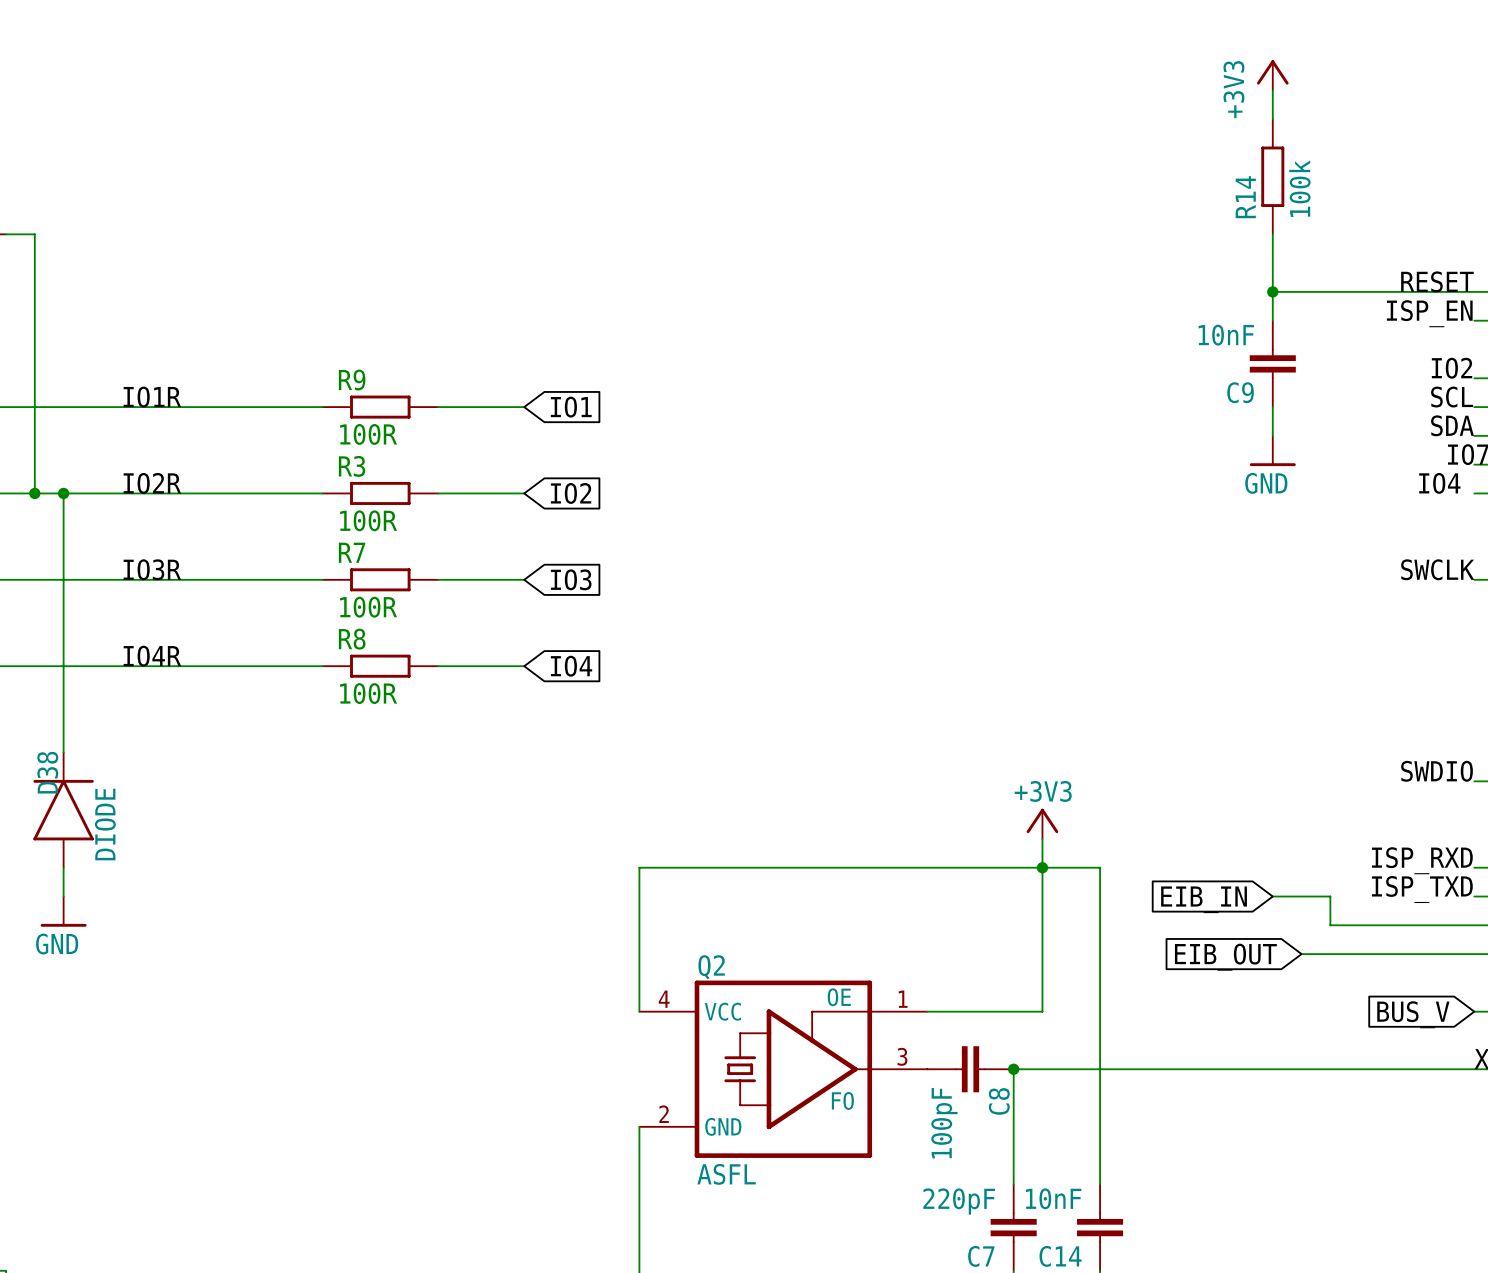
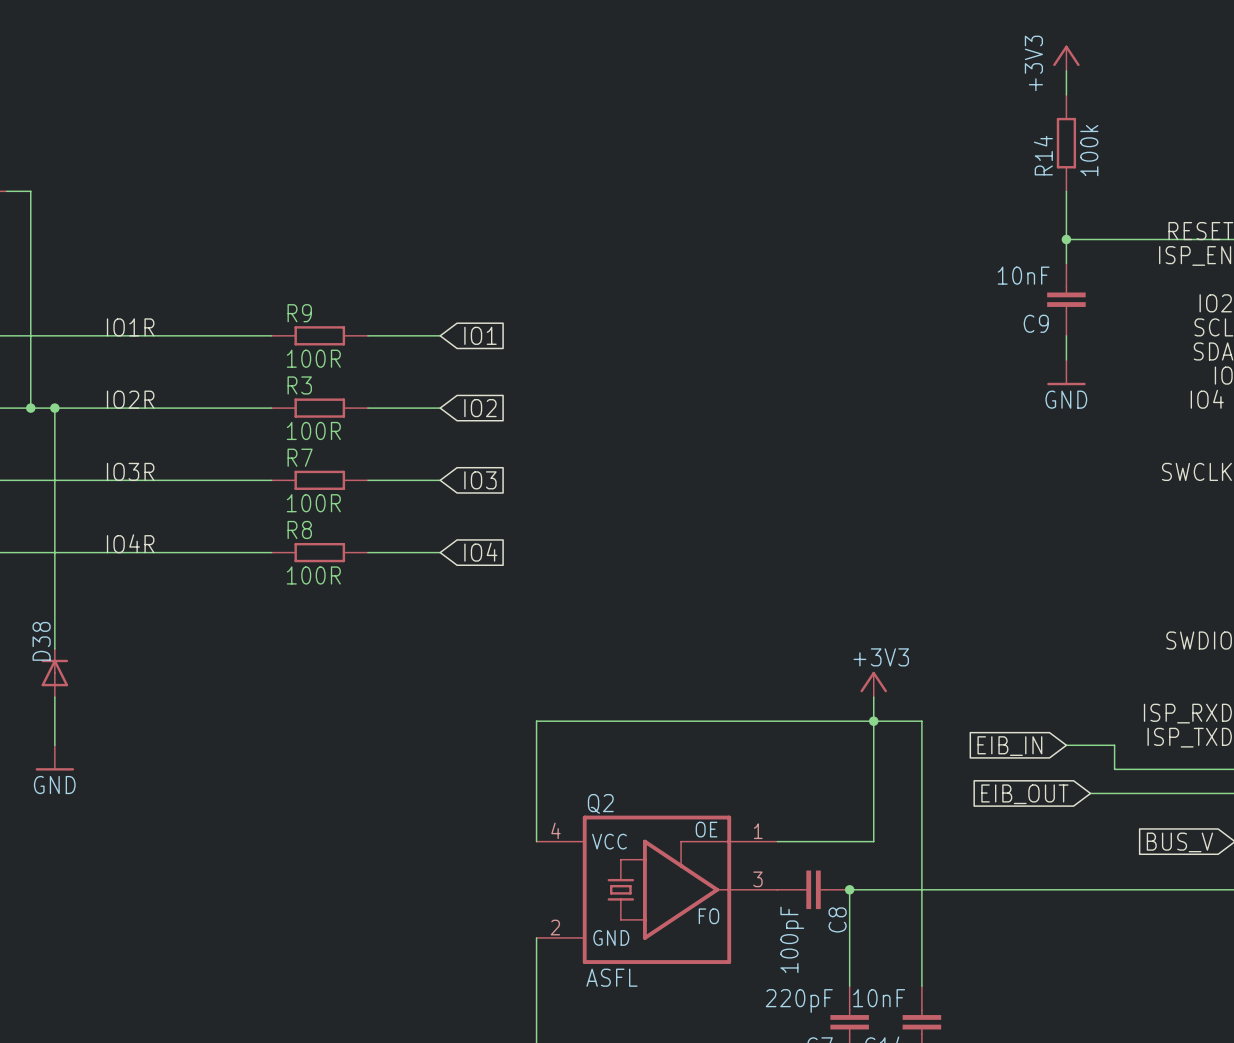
D38 symbol: [33, 752, 94, 868] -> [41, 648, 69, 698]
D38 value: DIODE (105, 824) -> none

